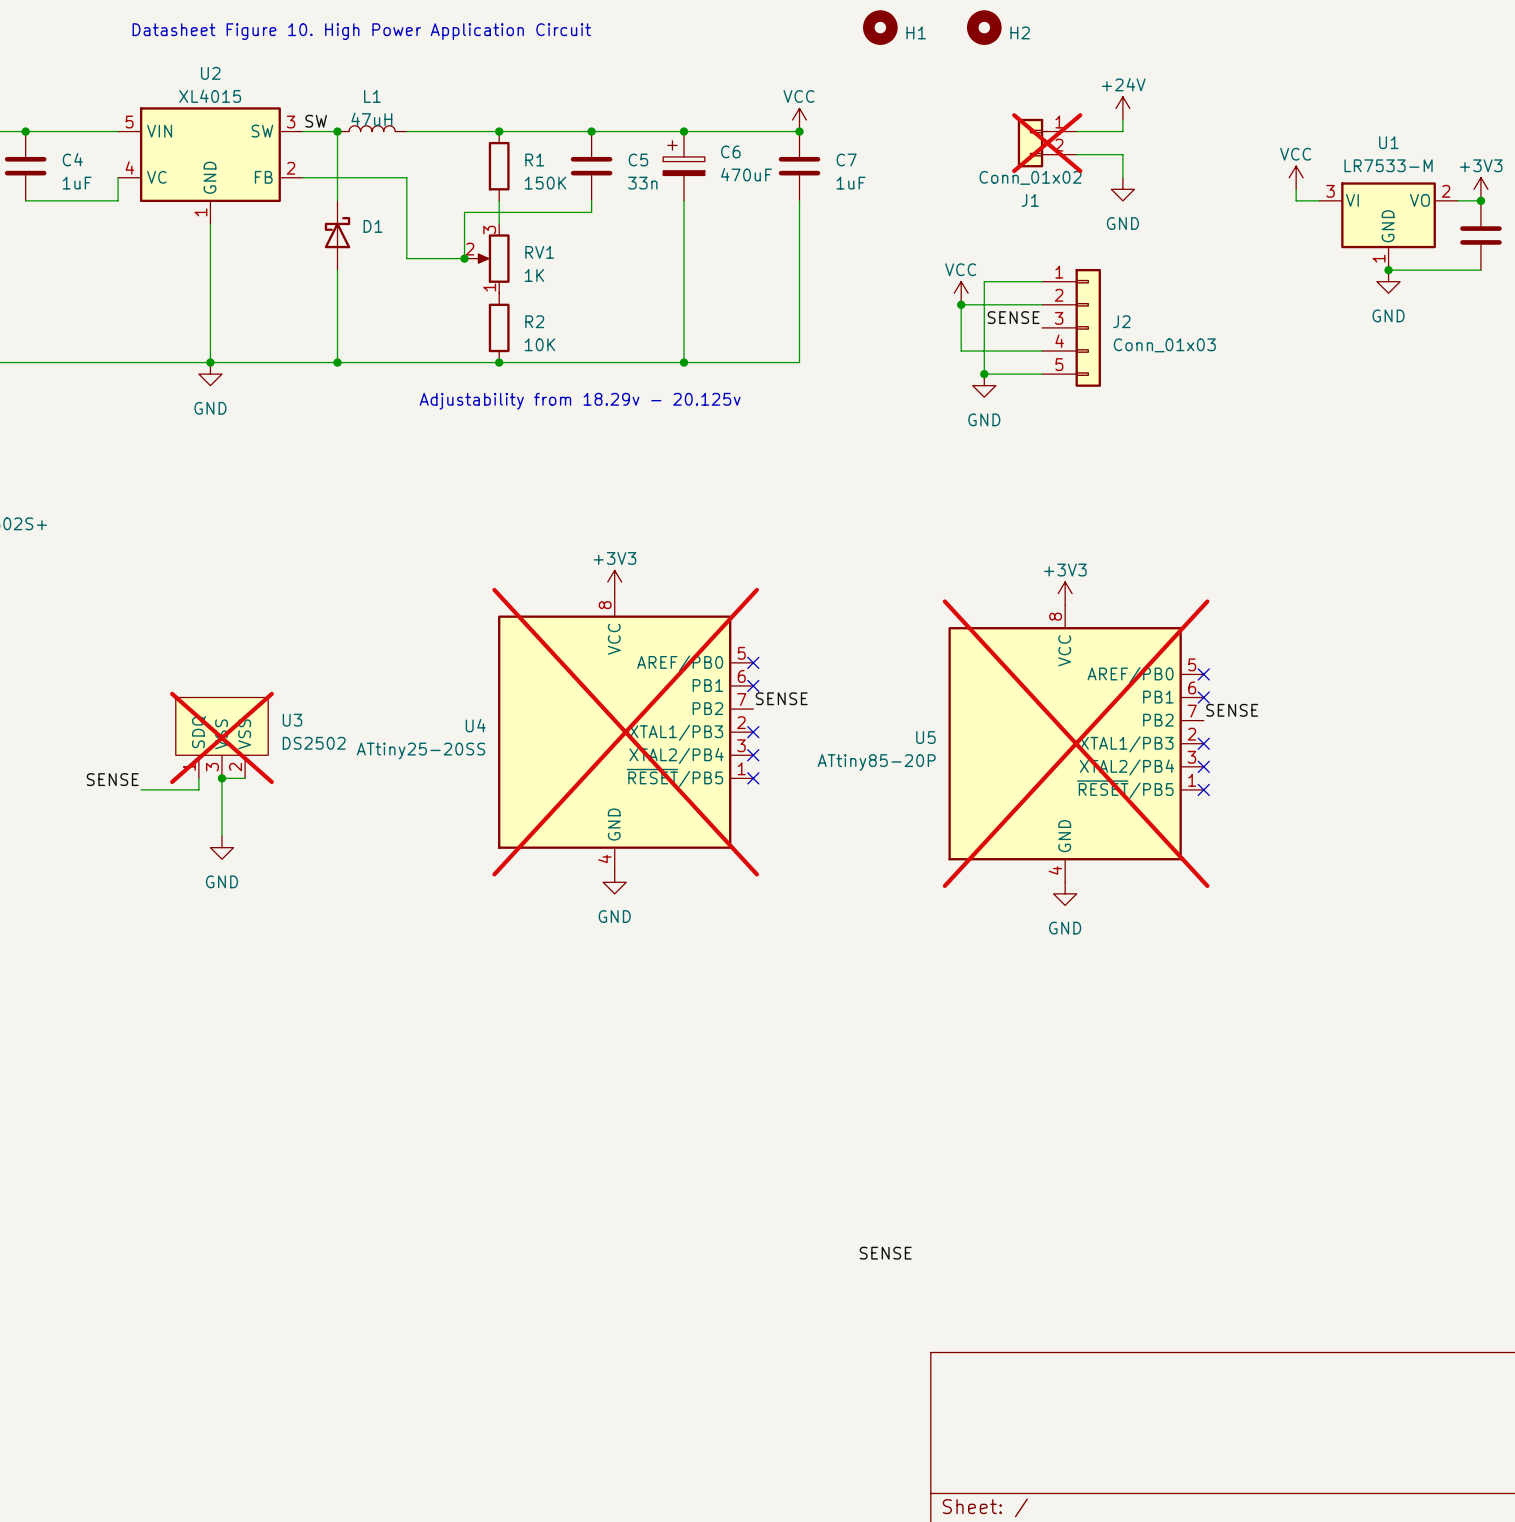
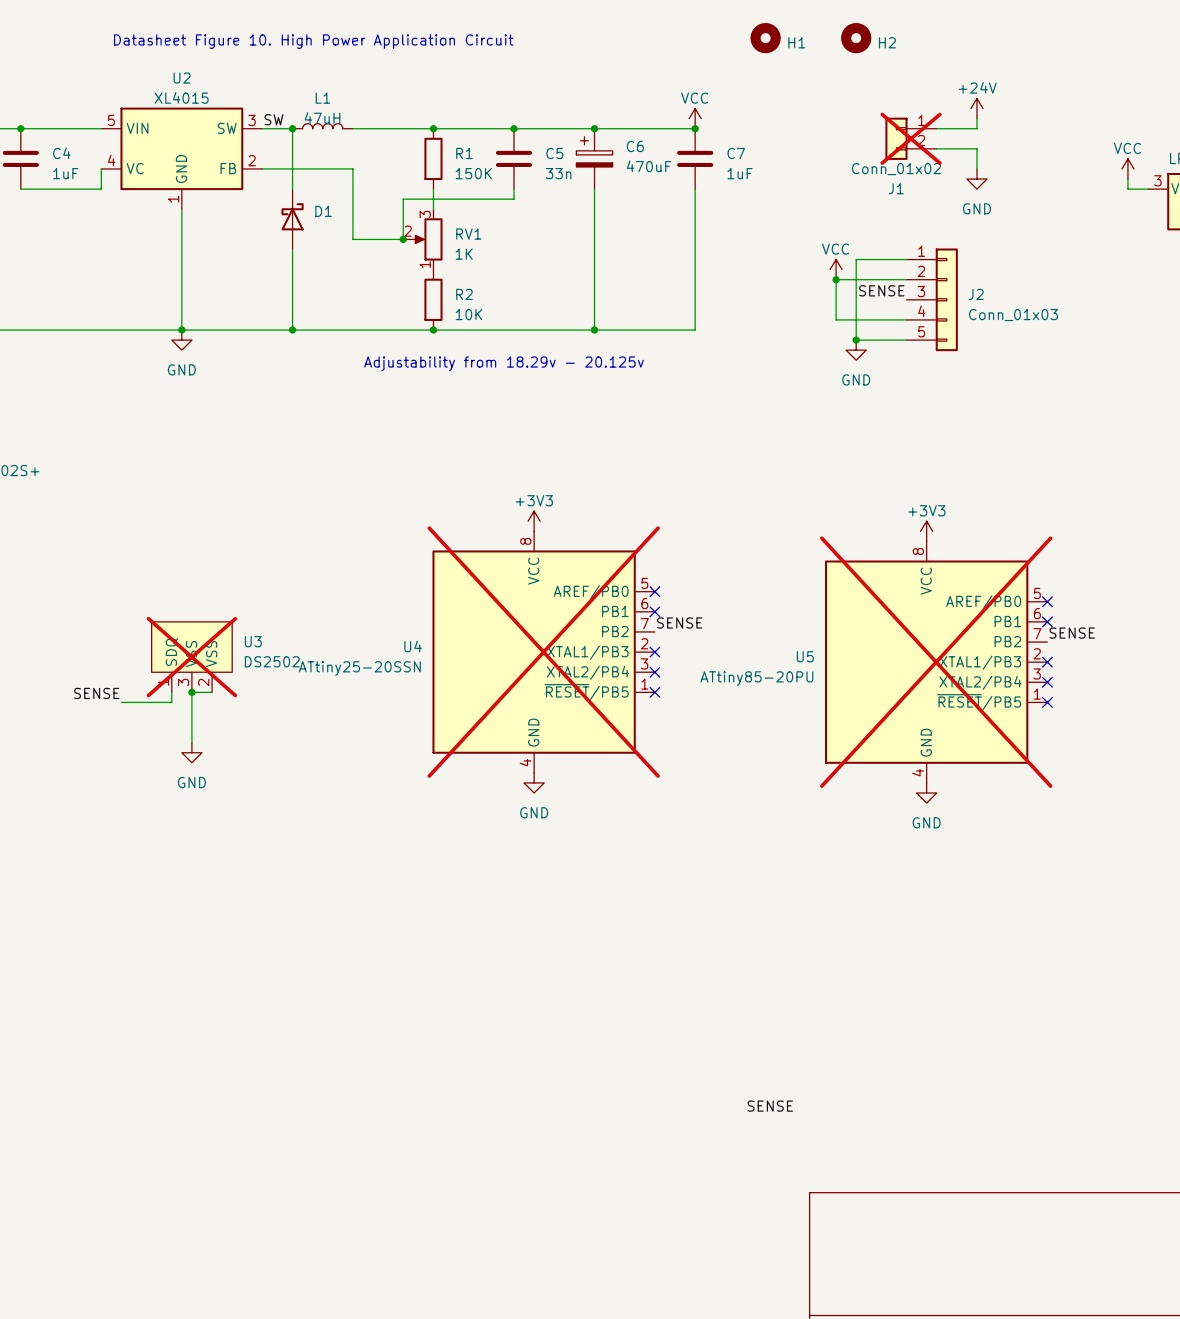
U4 value: ATtiny25-20SS (421, 750) -> ATtiny25-20SSN (359, 668)
U5 value: ATtiny85-20P (876, 762) -> ATtiny85-20PU (756, 678)

